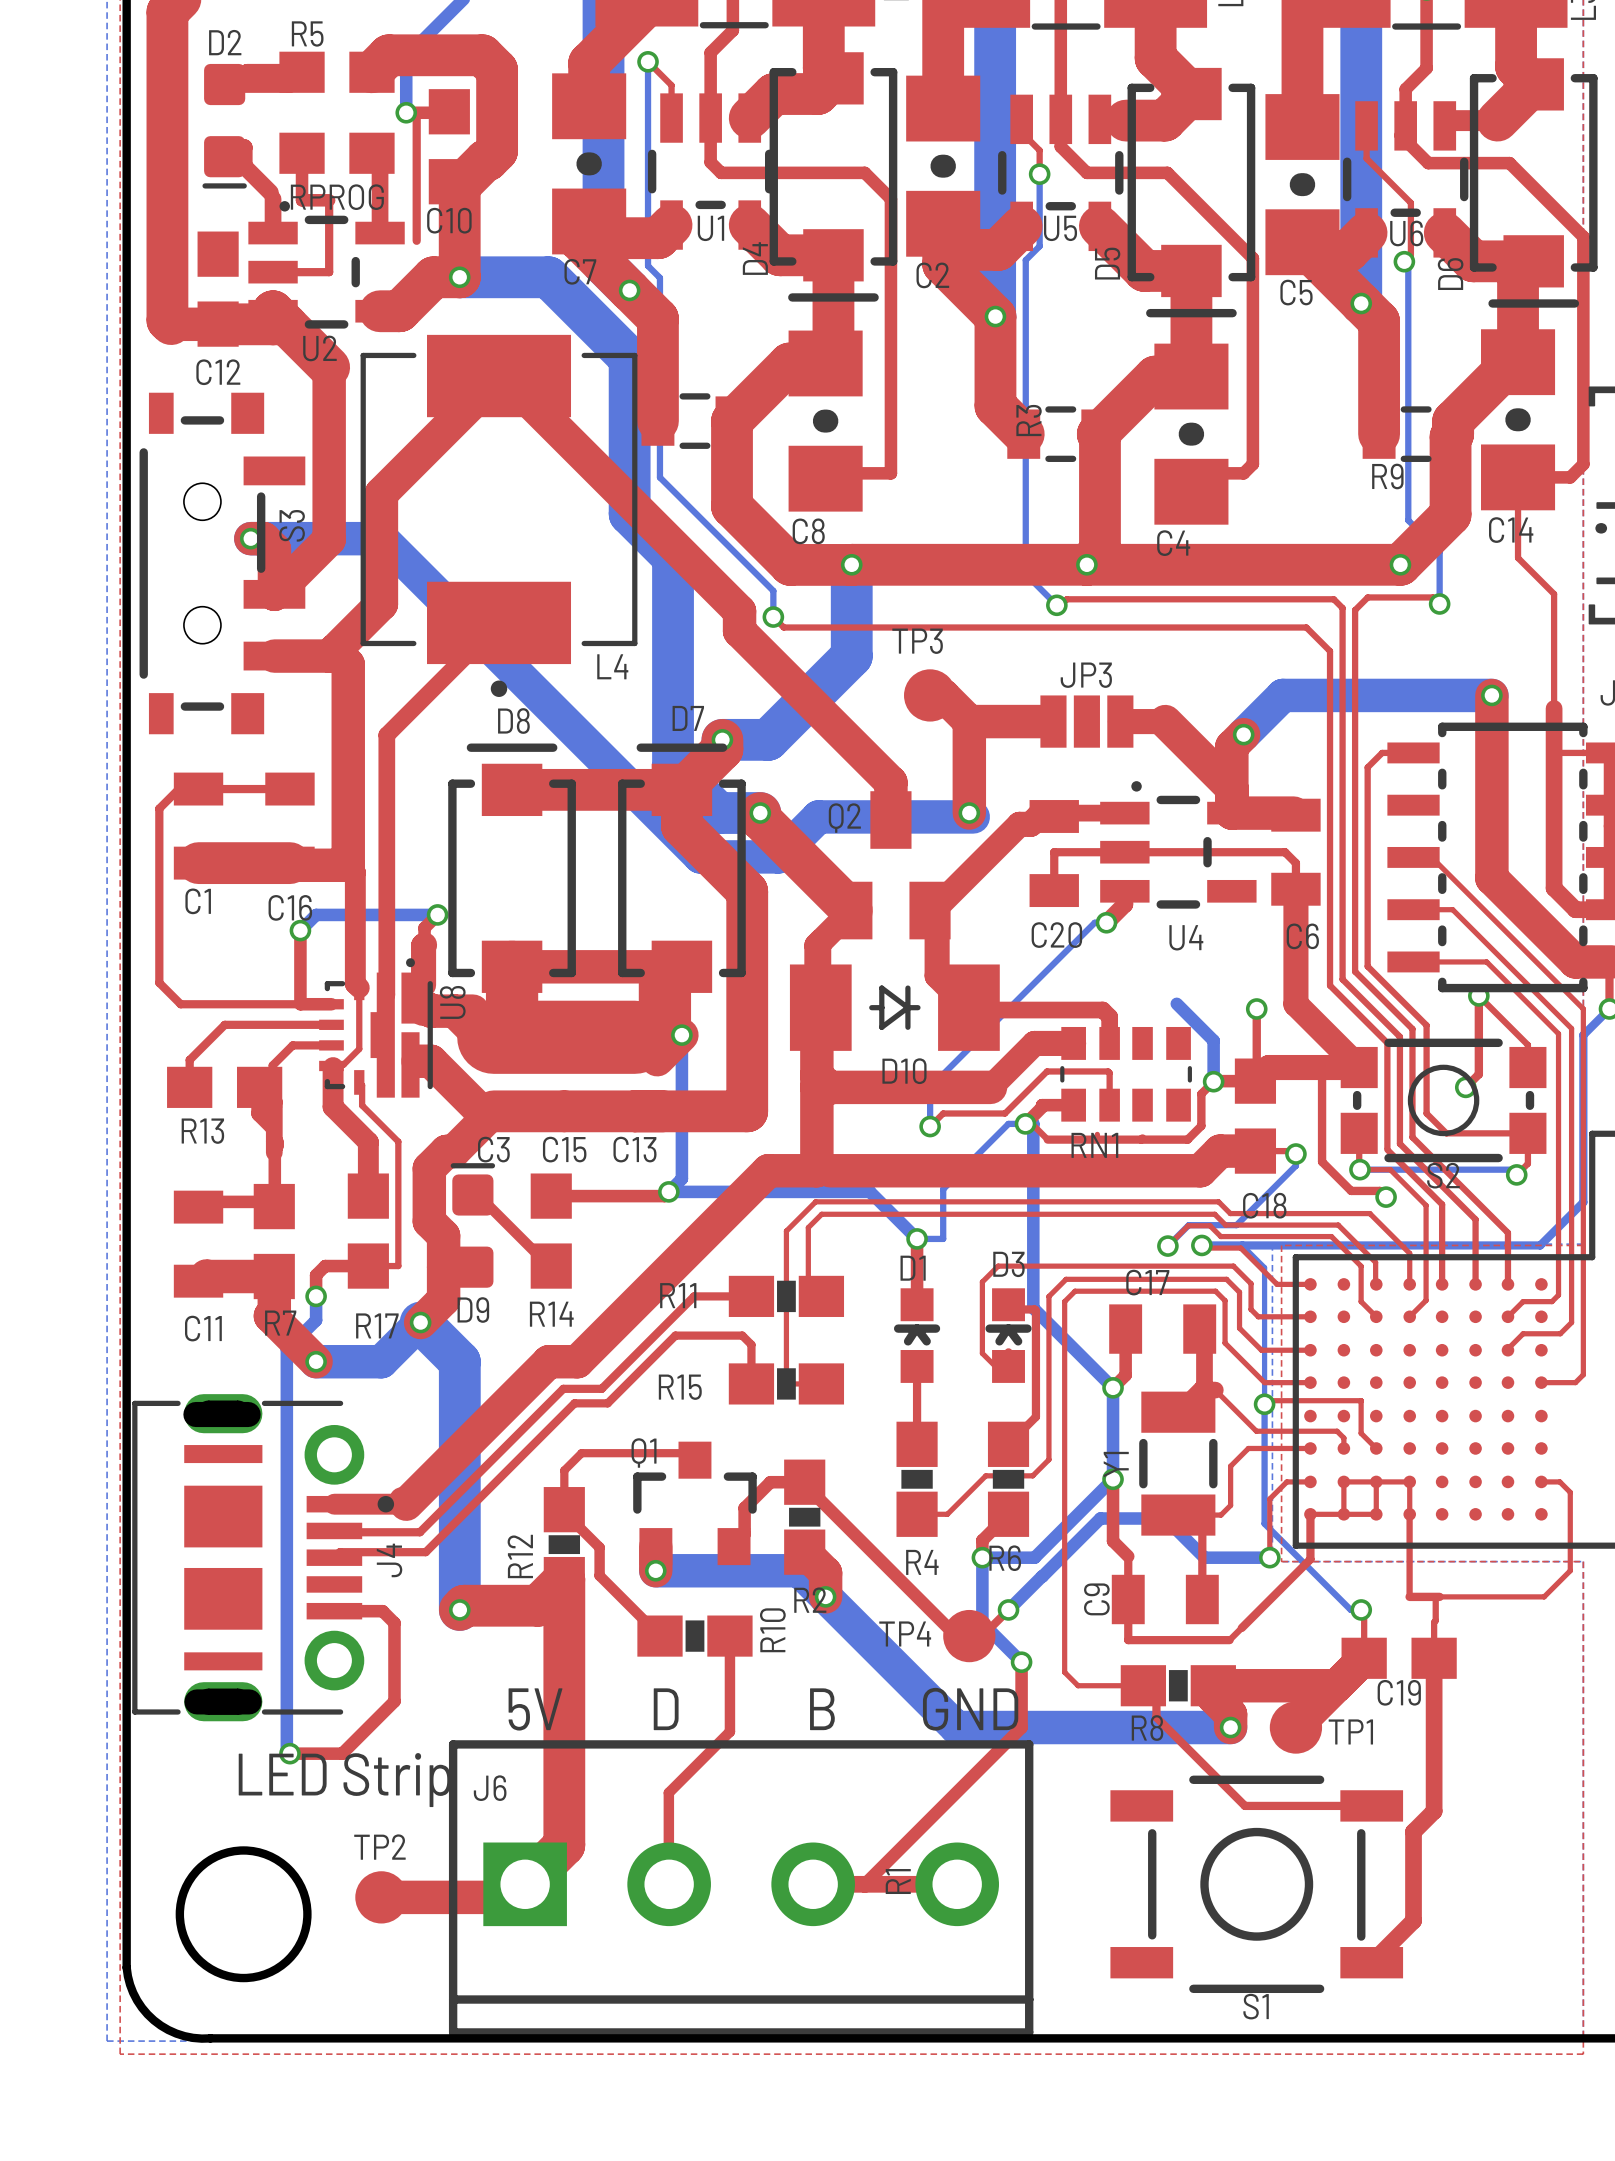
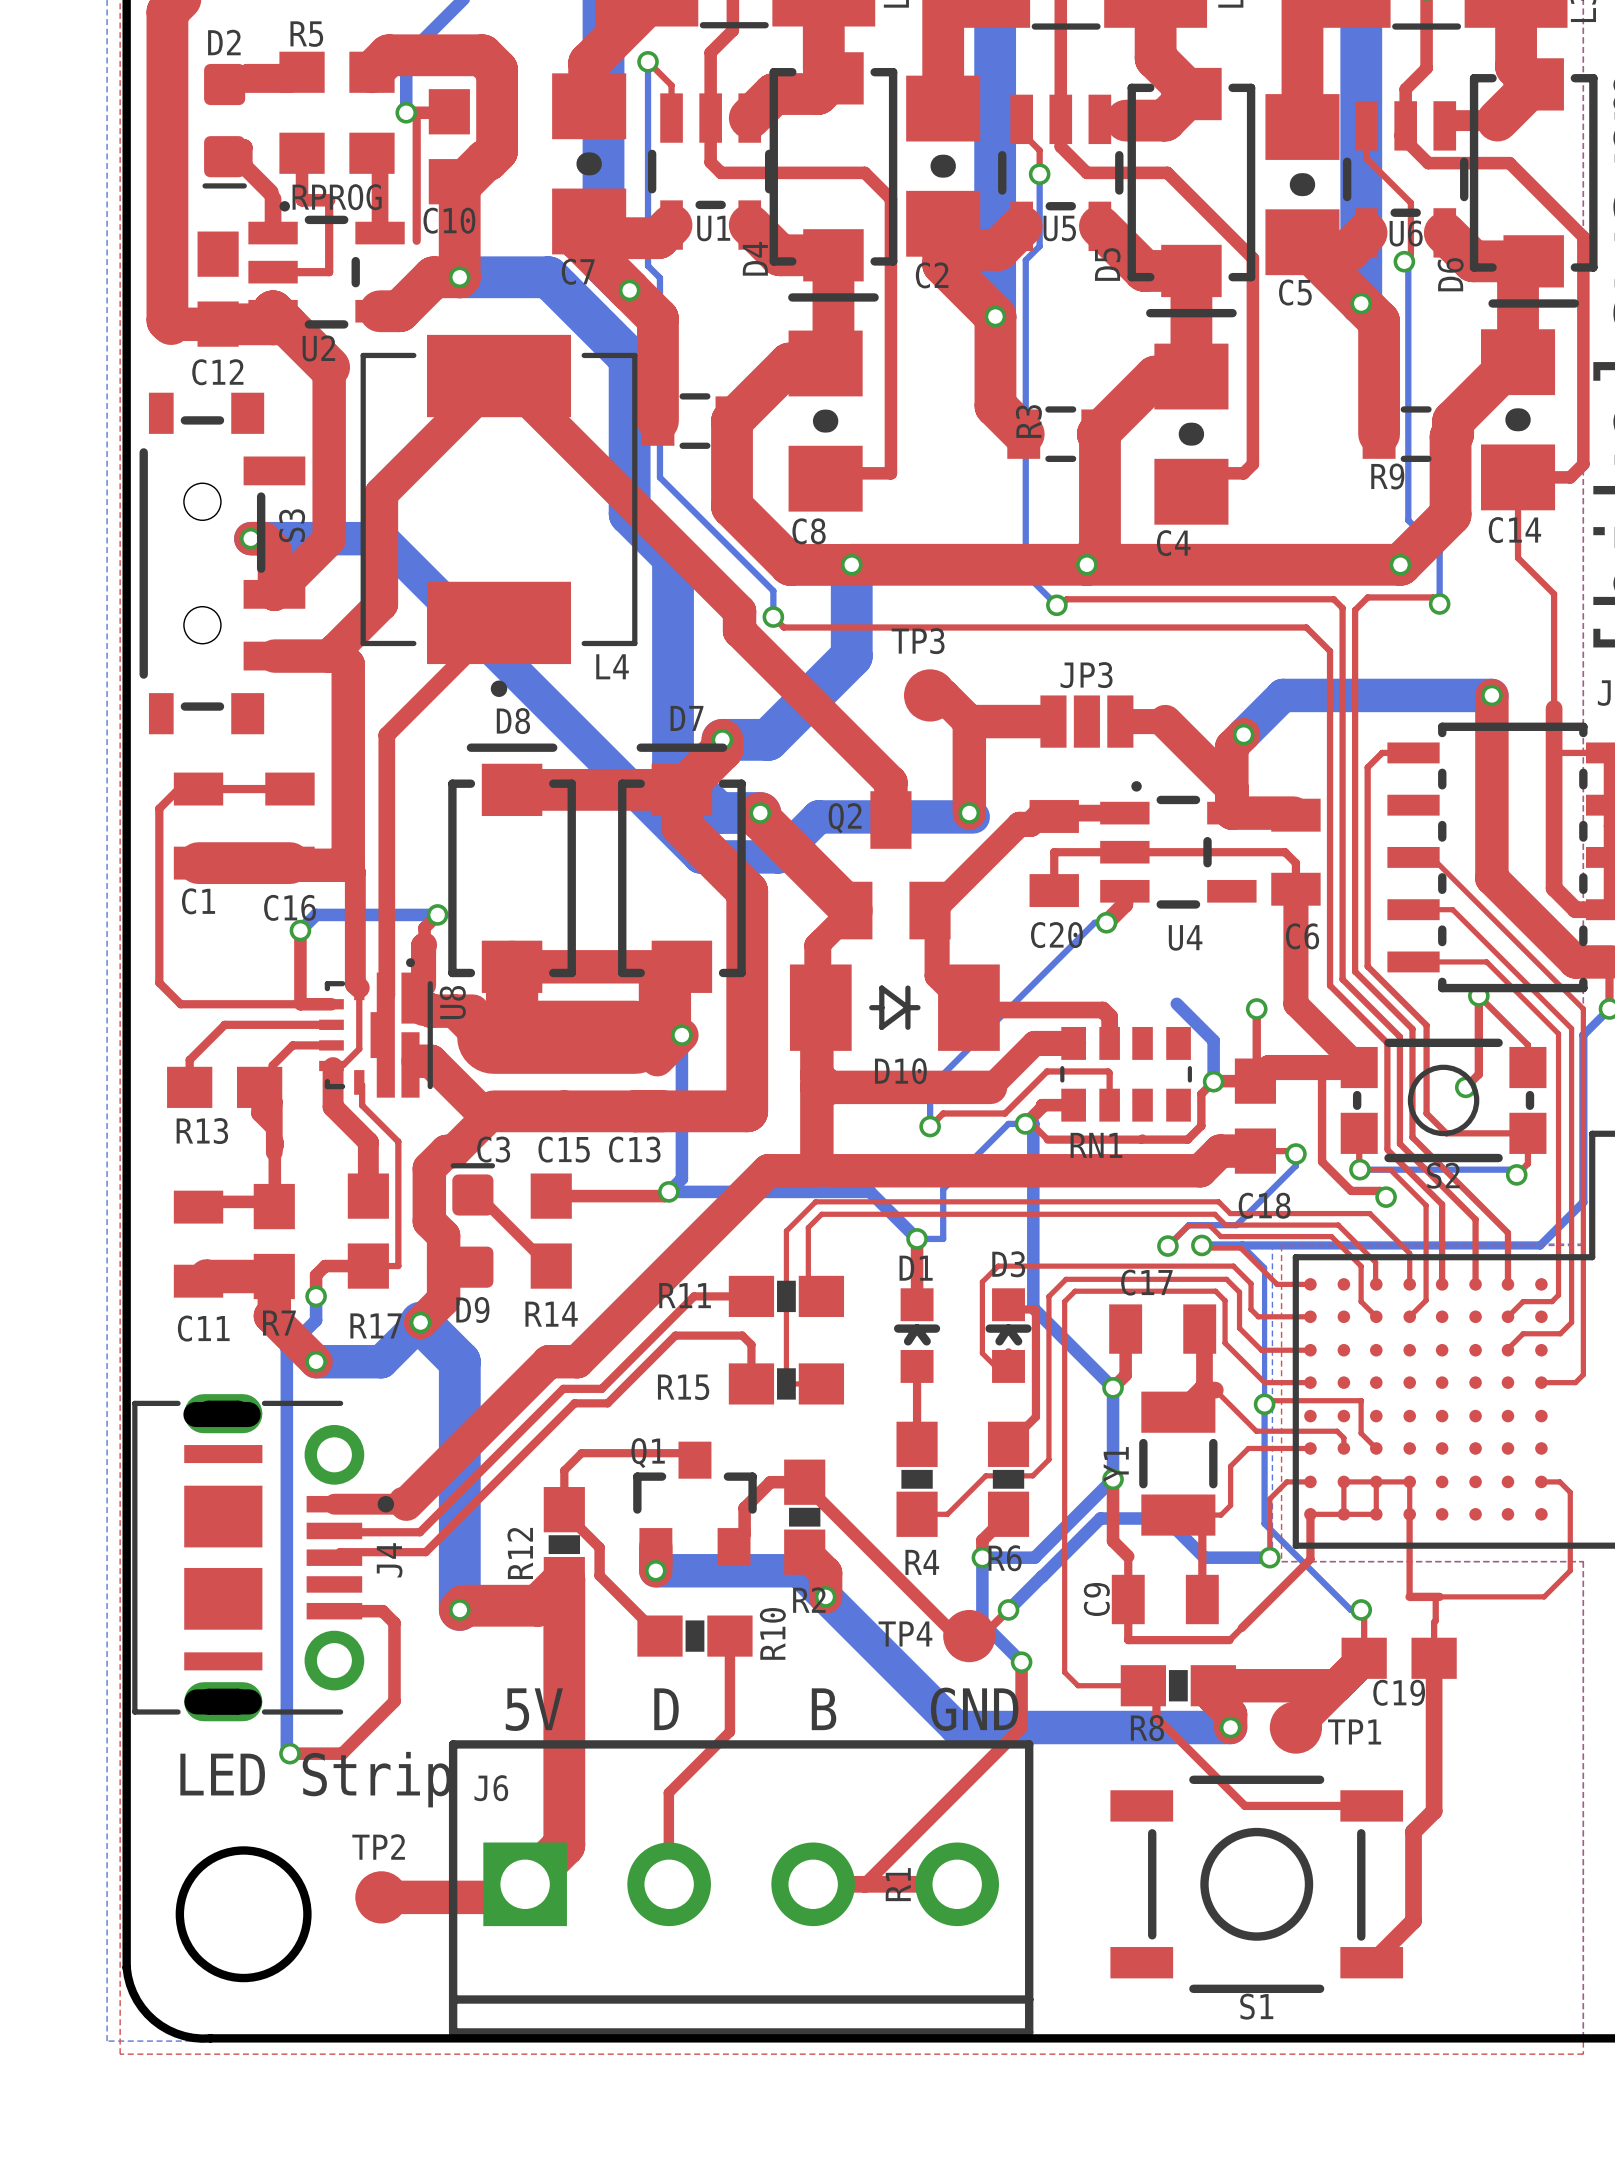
top track: (1097, 1134) (1097, 1136) -> none

